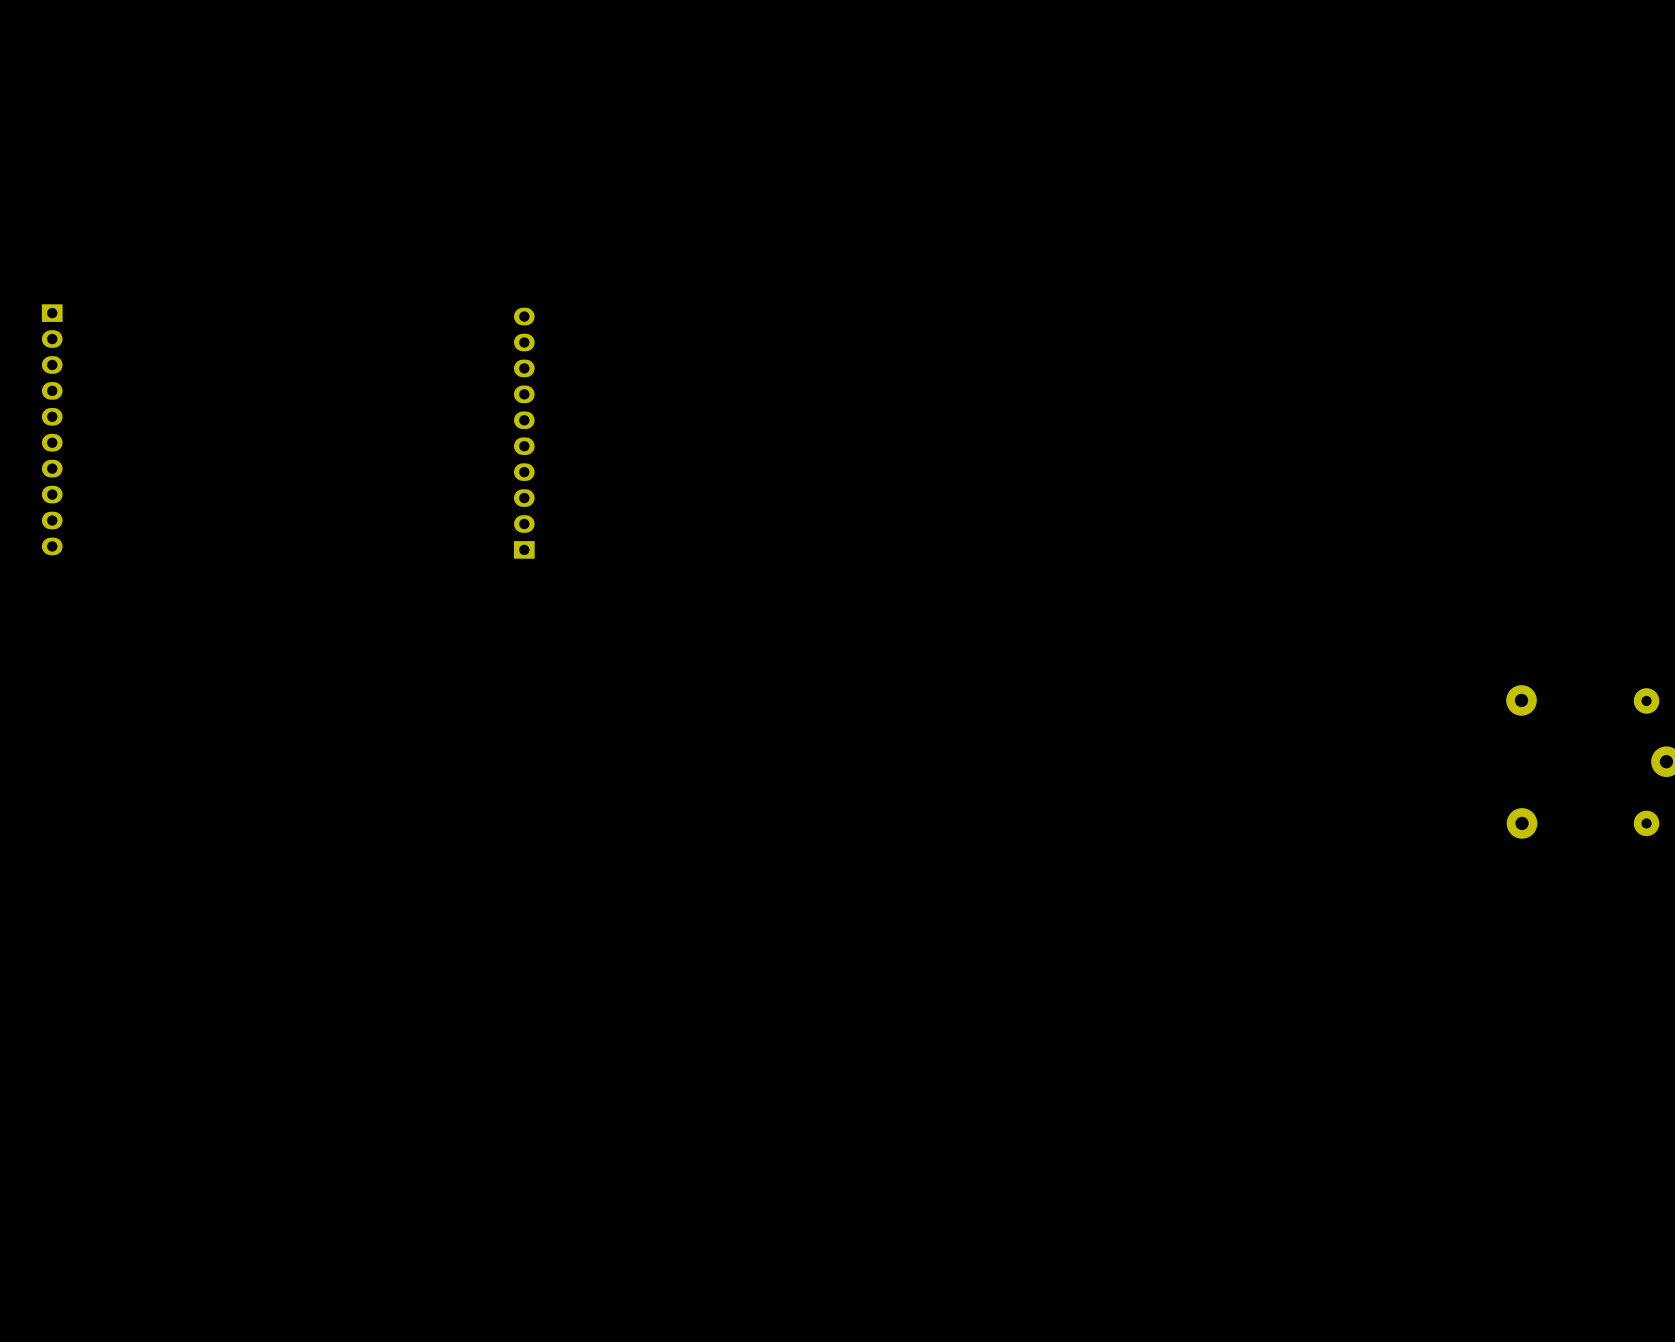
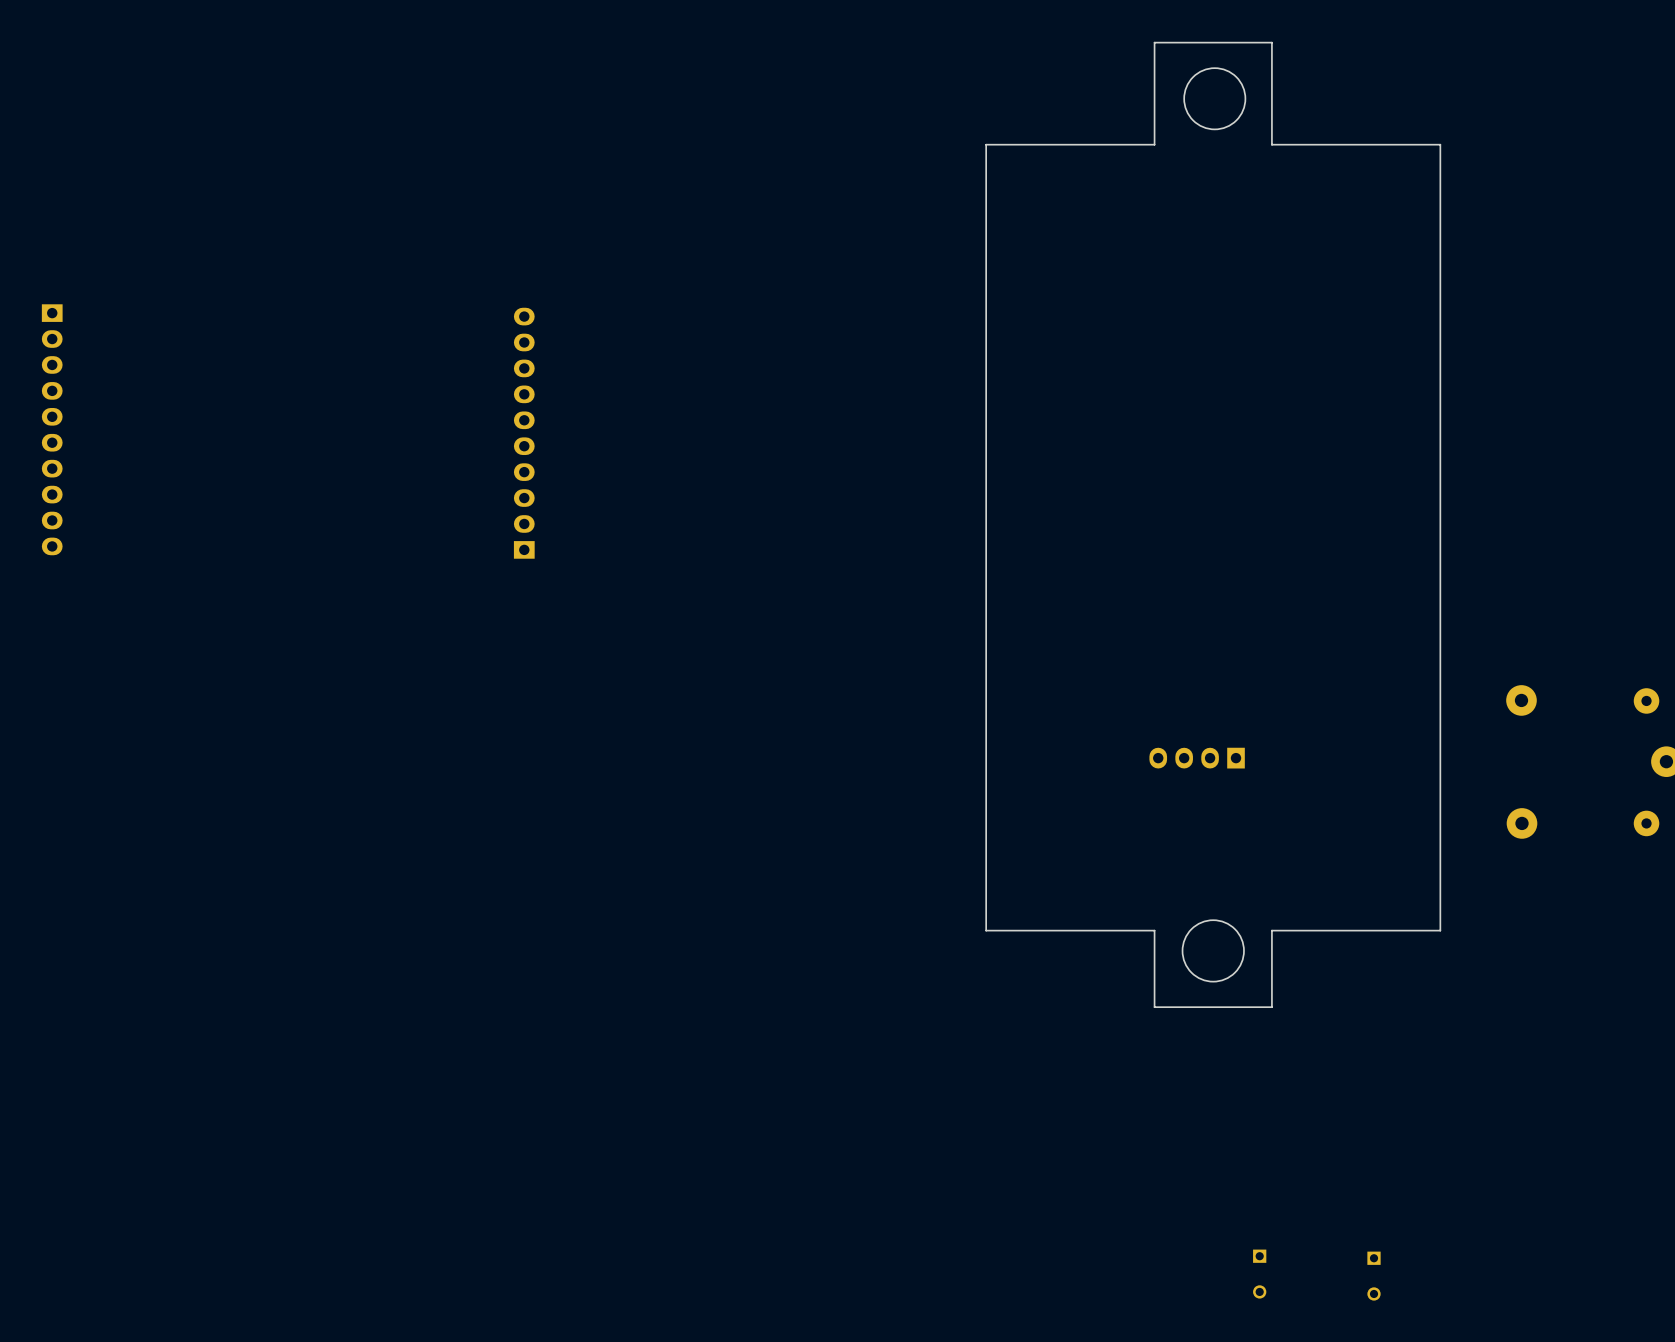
board edge: none -> (1271, 42) (1154, 42) (1154, 144) (986, 144) (986, 930) (1154, 930) (1154, 1007) (1271, 1007) (1271, 930) (1440, 930) (1440, 144) (1271, 144) (1271, 42)
round board edge: none -> [1183, 67, 1247, 131]
part: none -> (1197, 758)
round board edge: none -> [1181, 919, 1245, 983]
part: none -> (1259, 1274)
part: none -> (1374, 1276)

